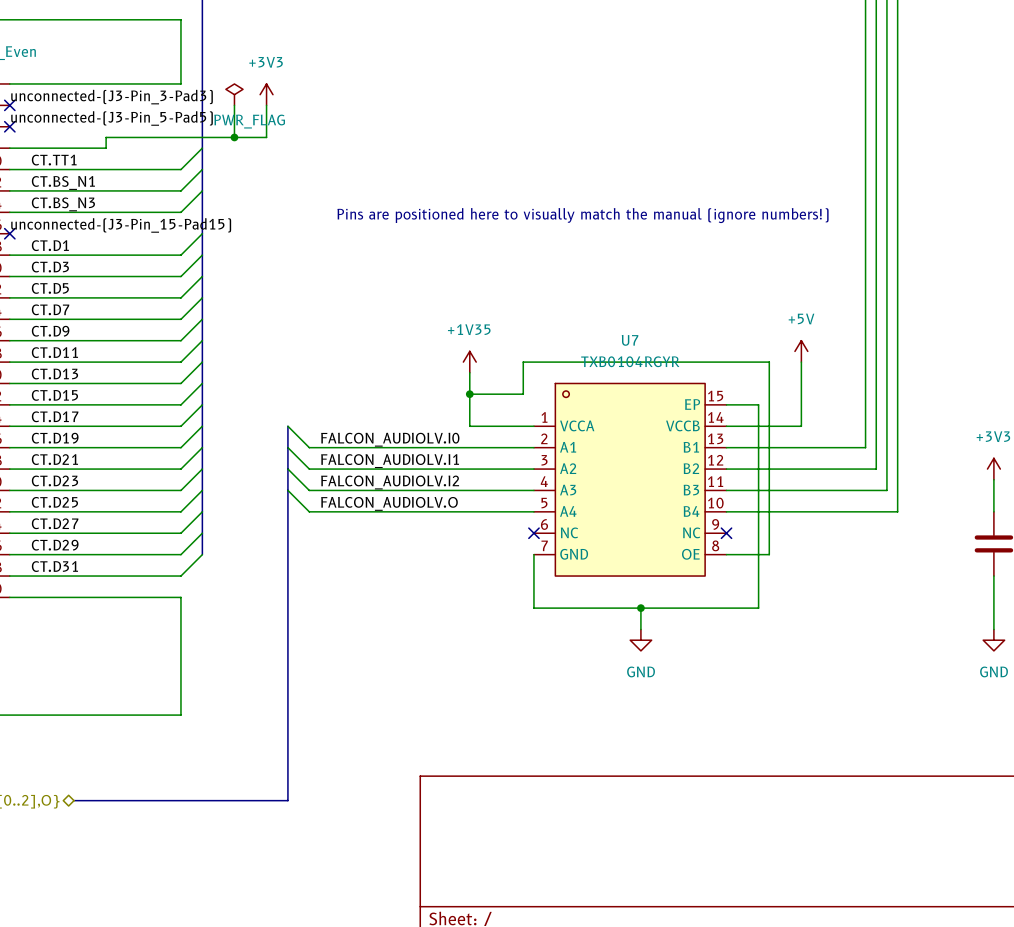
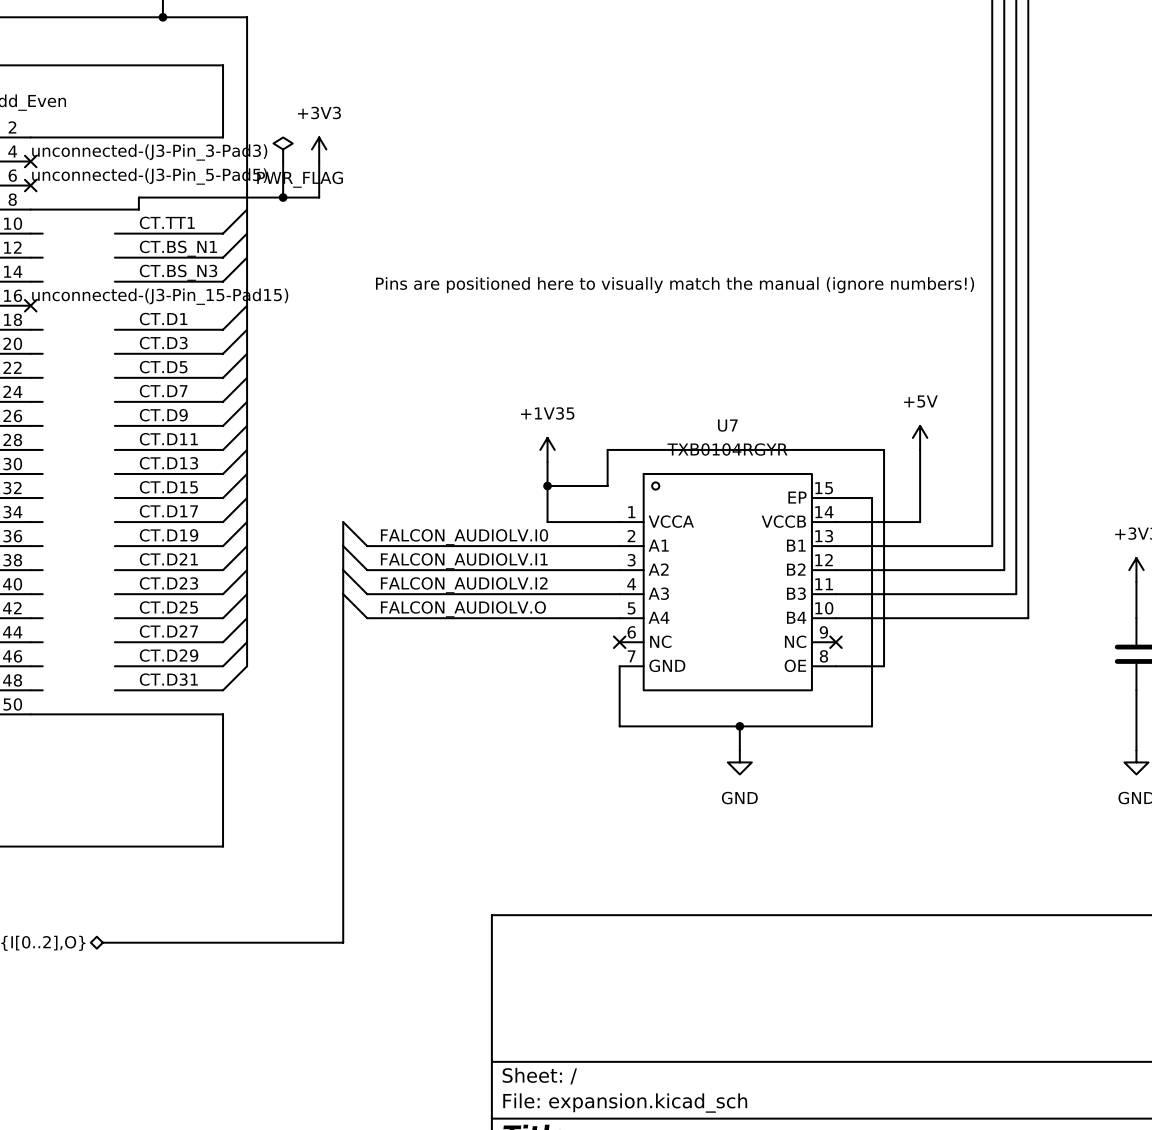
label position: CT.TT1 (54, 160) -> CT.TT1 (167, 222)
wire: (20, 169) (84, 169) -> none
label position: CT.BS_N1 (63, 183) -> CT.BS_N1 (178, 248)
wire: (20, 190) (84, 190) -> none
label position: CT.BS_N3 (63, 204) -> CT.BS_N3 (178, 272)
wire: (20, 212) (84, 212) -> none
label position: CT.D1 (50, 245) -> CT.D1 (163, 319)
wire: (20, 255) (84, 255) -> none
label position: CT.D3 (50, 267) -> CT.D3 (163, 343)
wire: (20, 276) (84, 276) -> none
label position: CT.D5 (50, 288) -> CT.D5 (163, 367)
wire: (20, 297) (84, 297) -> none
label position: CT.D7 (50, 309) -> CT.D7 (163, 391)
wire: (20, 319) (84, 319) -> none
label position: CT.D9 (50, 331) -> CT.D9 (163, 415)
wire: (20, 340) (84, 340) -> none
label position: CT.D11 (54, 352) -> CT.D11 (168, 439)
wire: (20, 362) (84, 362) -> none
label position: CT.D13 (54, 374) -> CT.D13 (168, 463)
wire: (20, 383) (84, 383) -> none
label position: CT.D15 (54, 395) -> CT.D15 (168, 487)
wire: (20, 404) (84, 404) -> none
label position: CT.D17 (55, 416) -> CT.D17 (168, 511)
wire: (20, 426) (84, 426) -> none
label position: CT.D19 (55, 438) -> CT.D19 (169, 535)
wire: (20, 447) (84, 447) -> none
label position: CT.D21 (54, 459) -> CT.D21 (168, 559)
wire: (20, 469) (84, 469) -> none
label position: CT.D23 (54, 480) -> CT.D23 (168, 583)
wire: (20, 490) (84, 490) -> none
label position: CT.D25 (54, 502) -> CT.D25 (168, 607)
wire: (20, 511) (84, 511) -> none
label position: CT.D27 (55, 523) -> CT.D27 (168, 631)
wire: (20, 533) (84, 533) -> none
label position: CT.D29 (55, 545) -> CT.D29 (169, 655)
wire: (20, 554) (84, 554) -> none
label position: CT.D31 (54, 566) -> CT.D31 (168, 679)
wire: (20, 576) (84, 576) -> none

